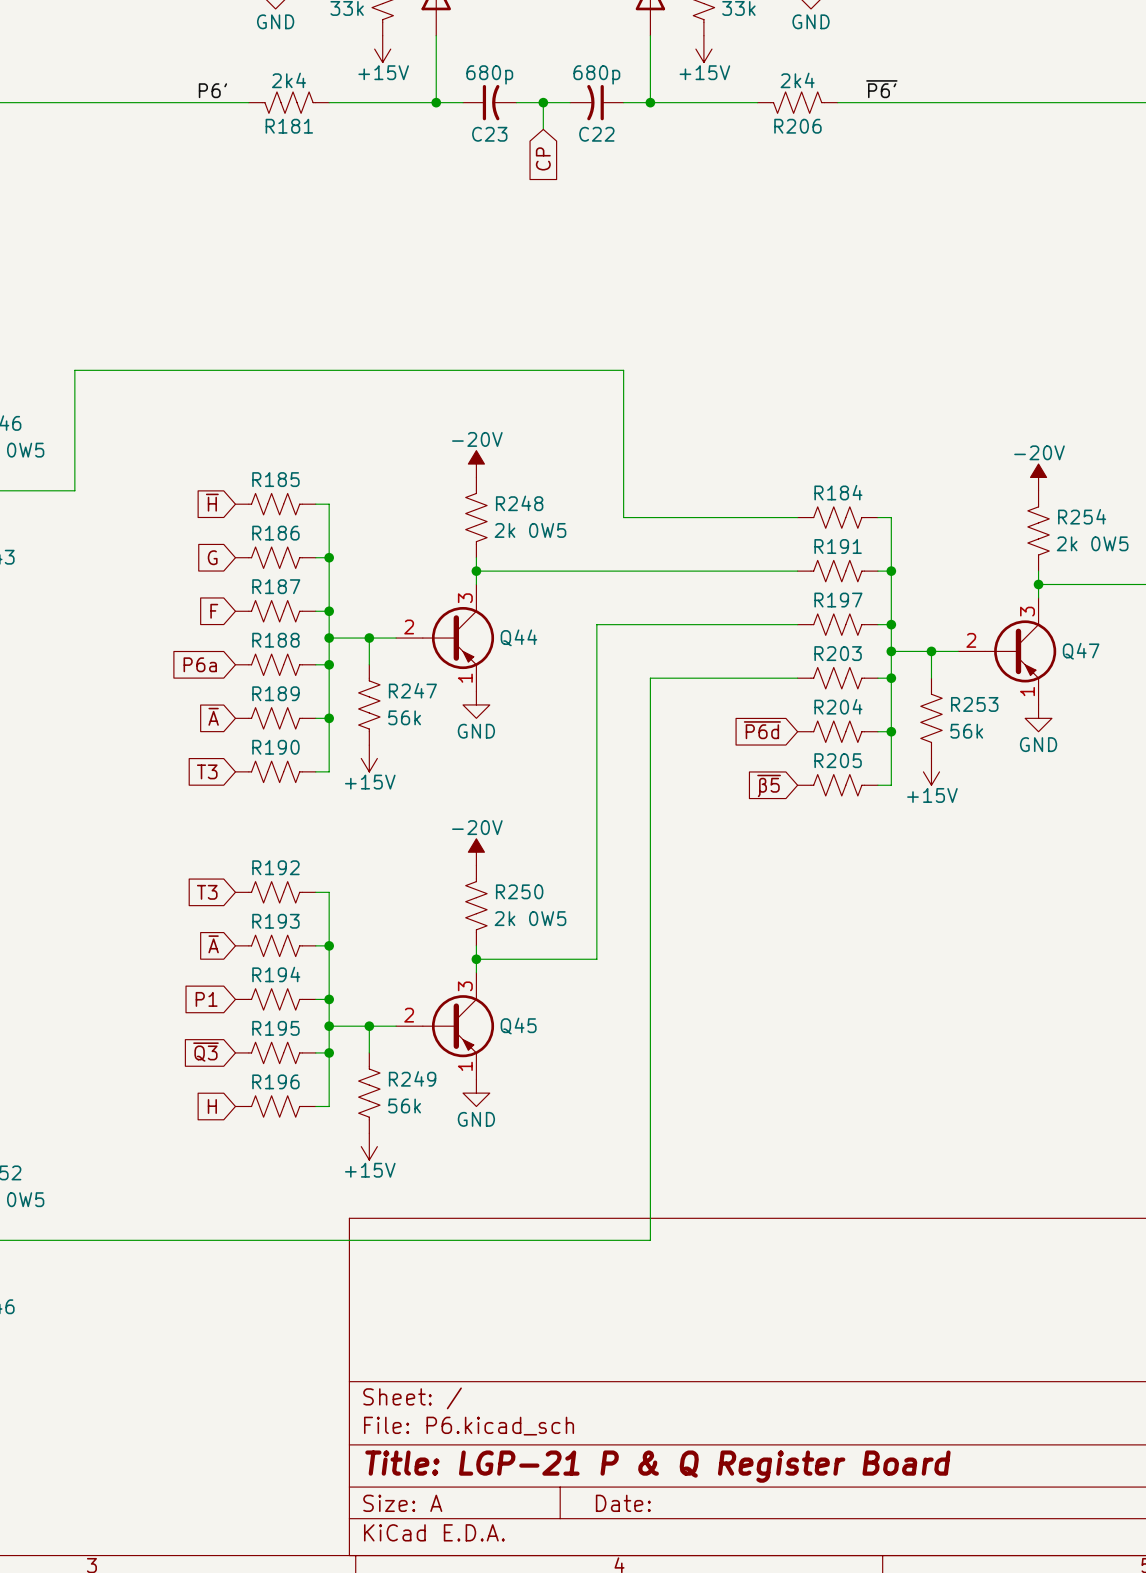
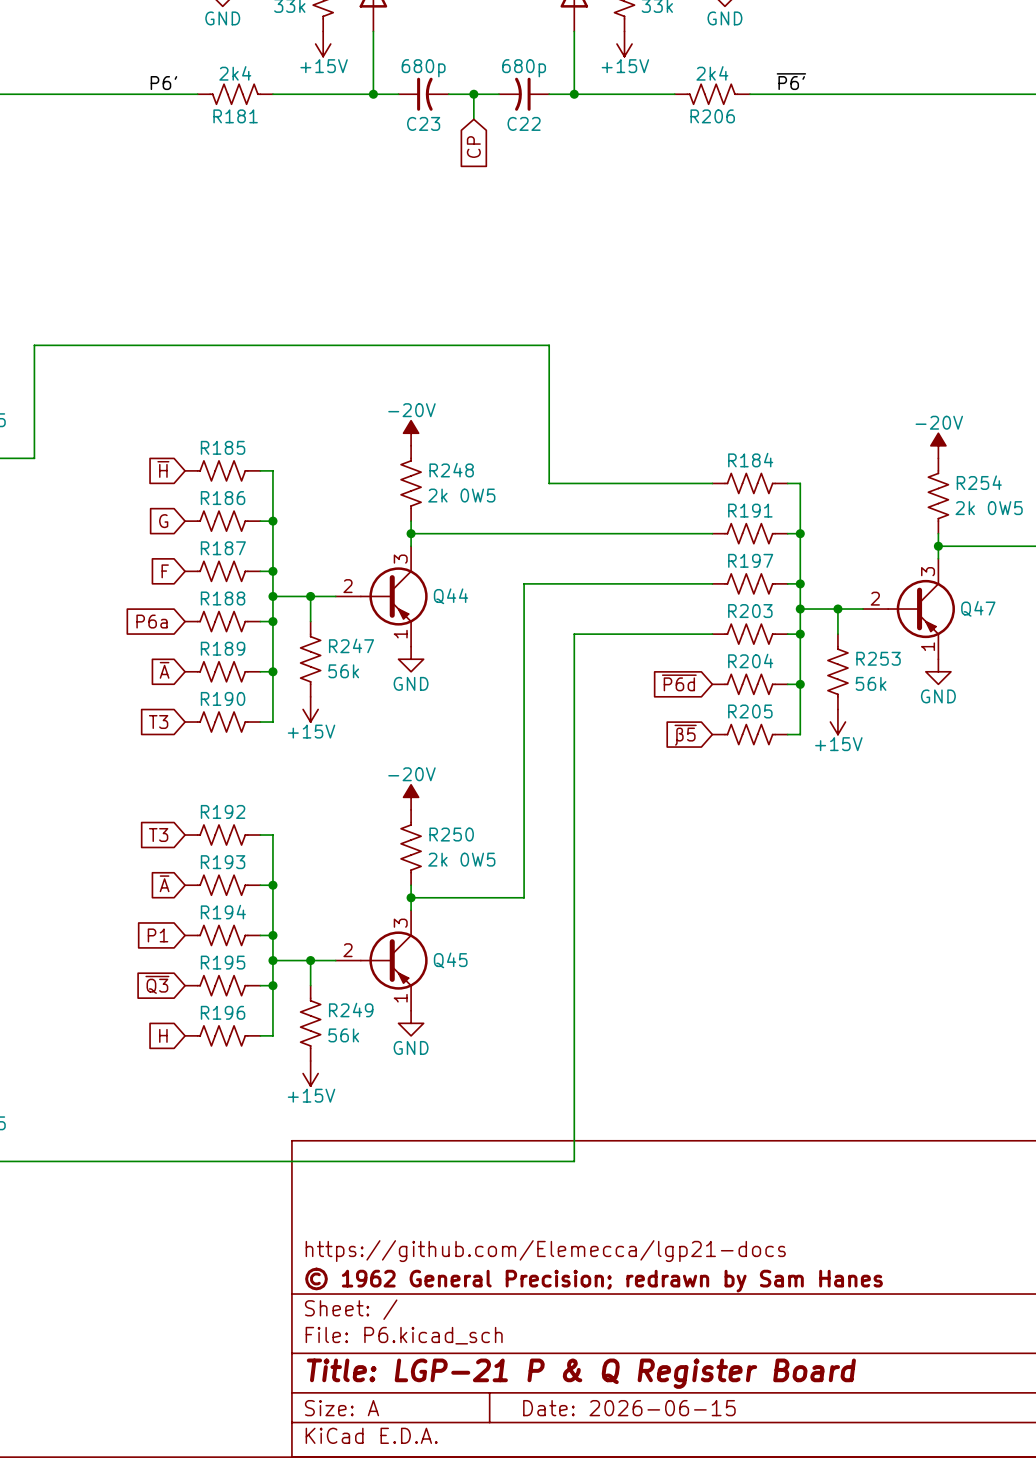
title block: none -> https://github.com/Elemecca/lgp21-docs (545, 1251)
title block: none -> © 1962 General Precision; redrawn by Sam Hanes (594, 1280)
title block: Date: (623, 1503) -> Date: 2026-06-15 (629, 1408)

